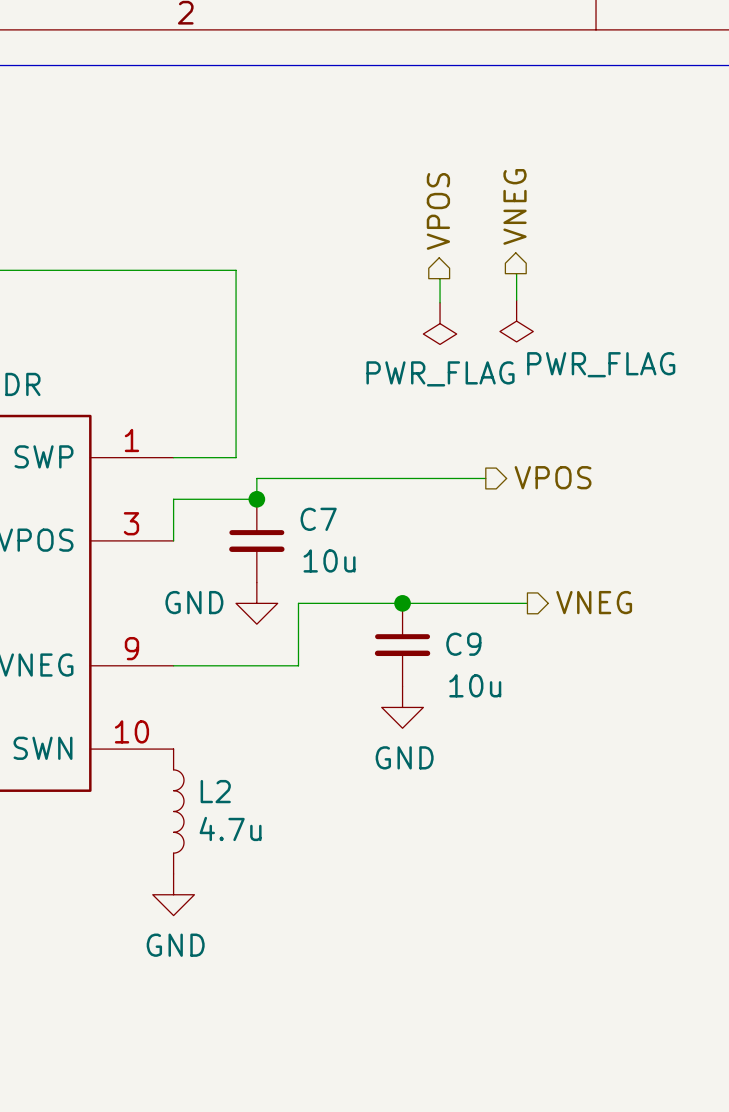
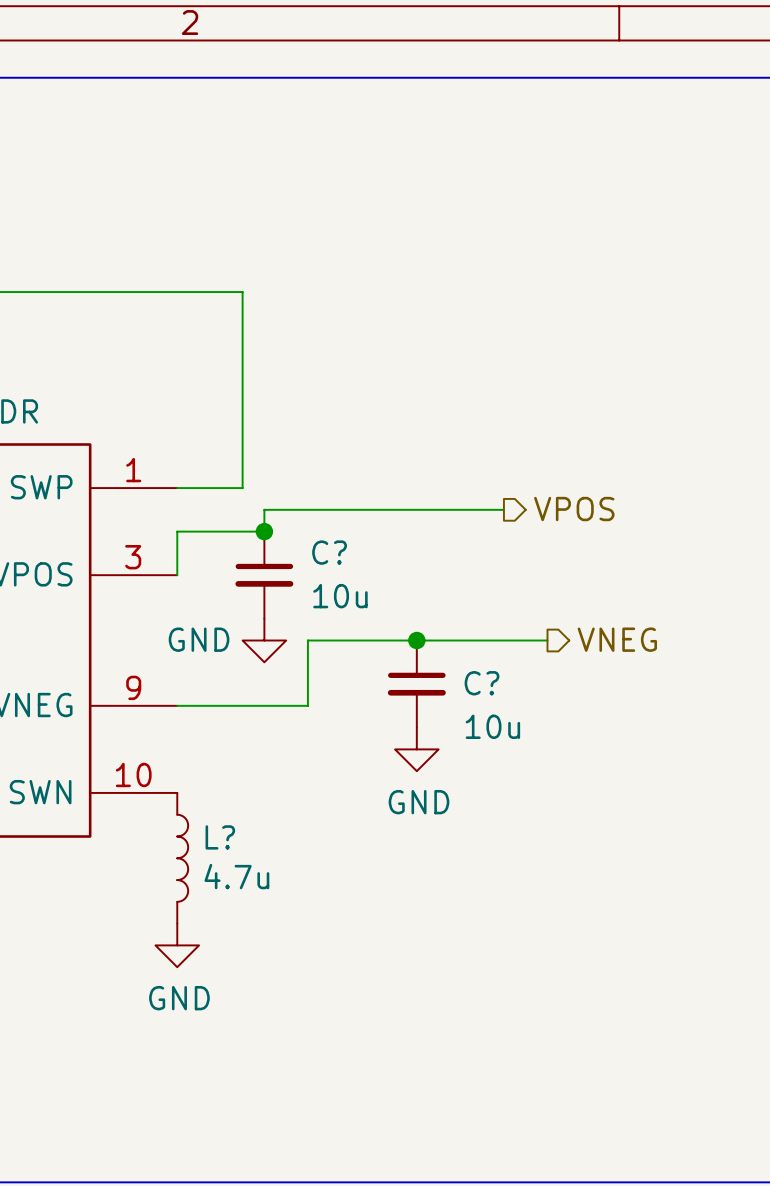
hierarchical label: VNEG (515, 206) -> none
hierarchical label: VPOS (438, 211) -> none
wire: (515, 273) (516, 300) -> none
wire: (439, 278) (440, 302) -> none
power symbol: PWR_FLAG (516, 321) -> none
power symbol: PWR_FLAG (440, 323) -> none
C7 name: C7 (318, 519) -> C? (329, 552)
C9 name: C9 (463, 644) -> C? (482, 683)
L2 name: L2 (215, 791) -> L? (220, 837)

